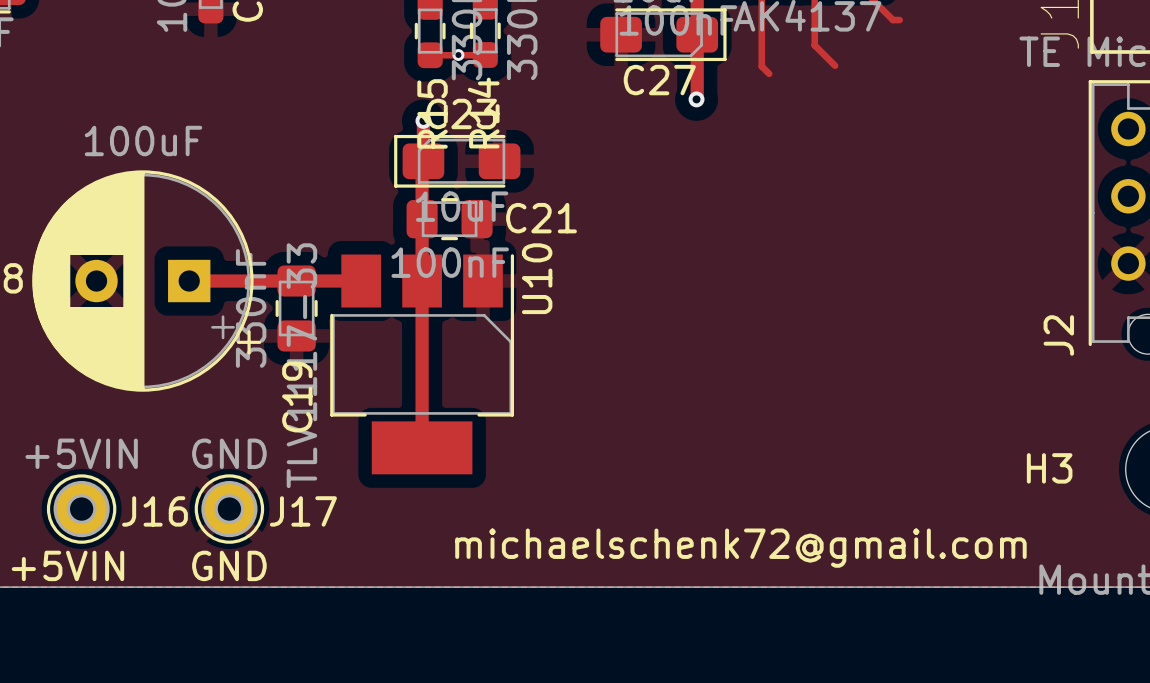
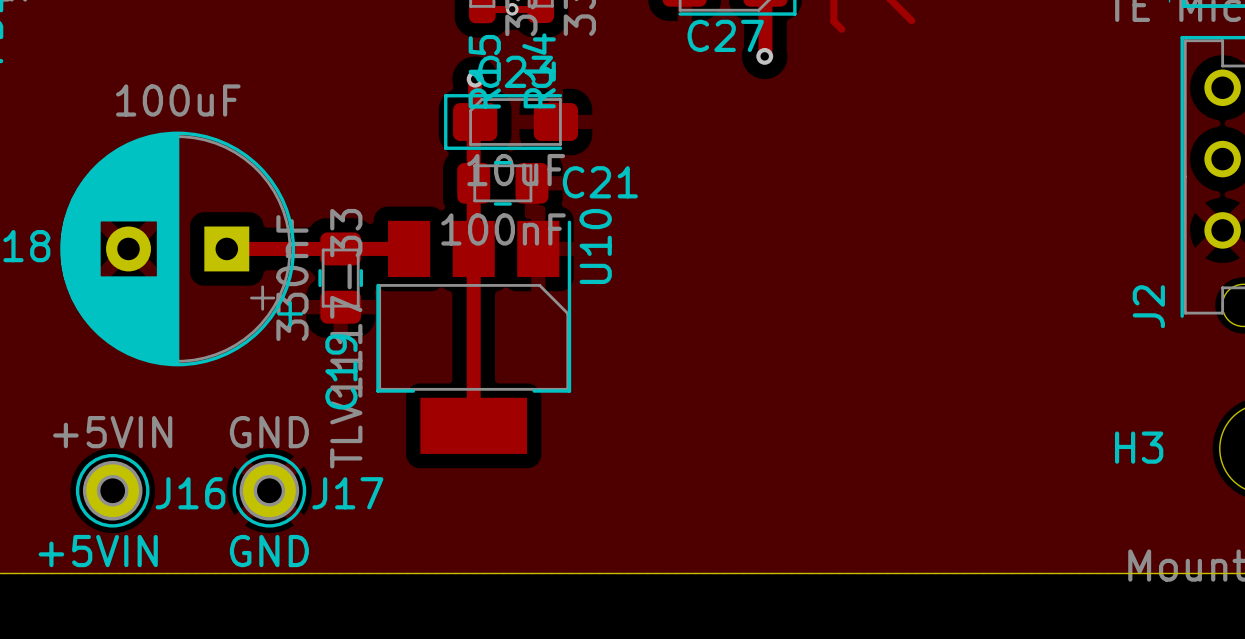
text: michaelschenk72@gmail.com (740, 548) -> none

